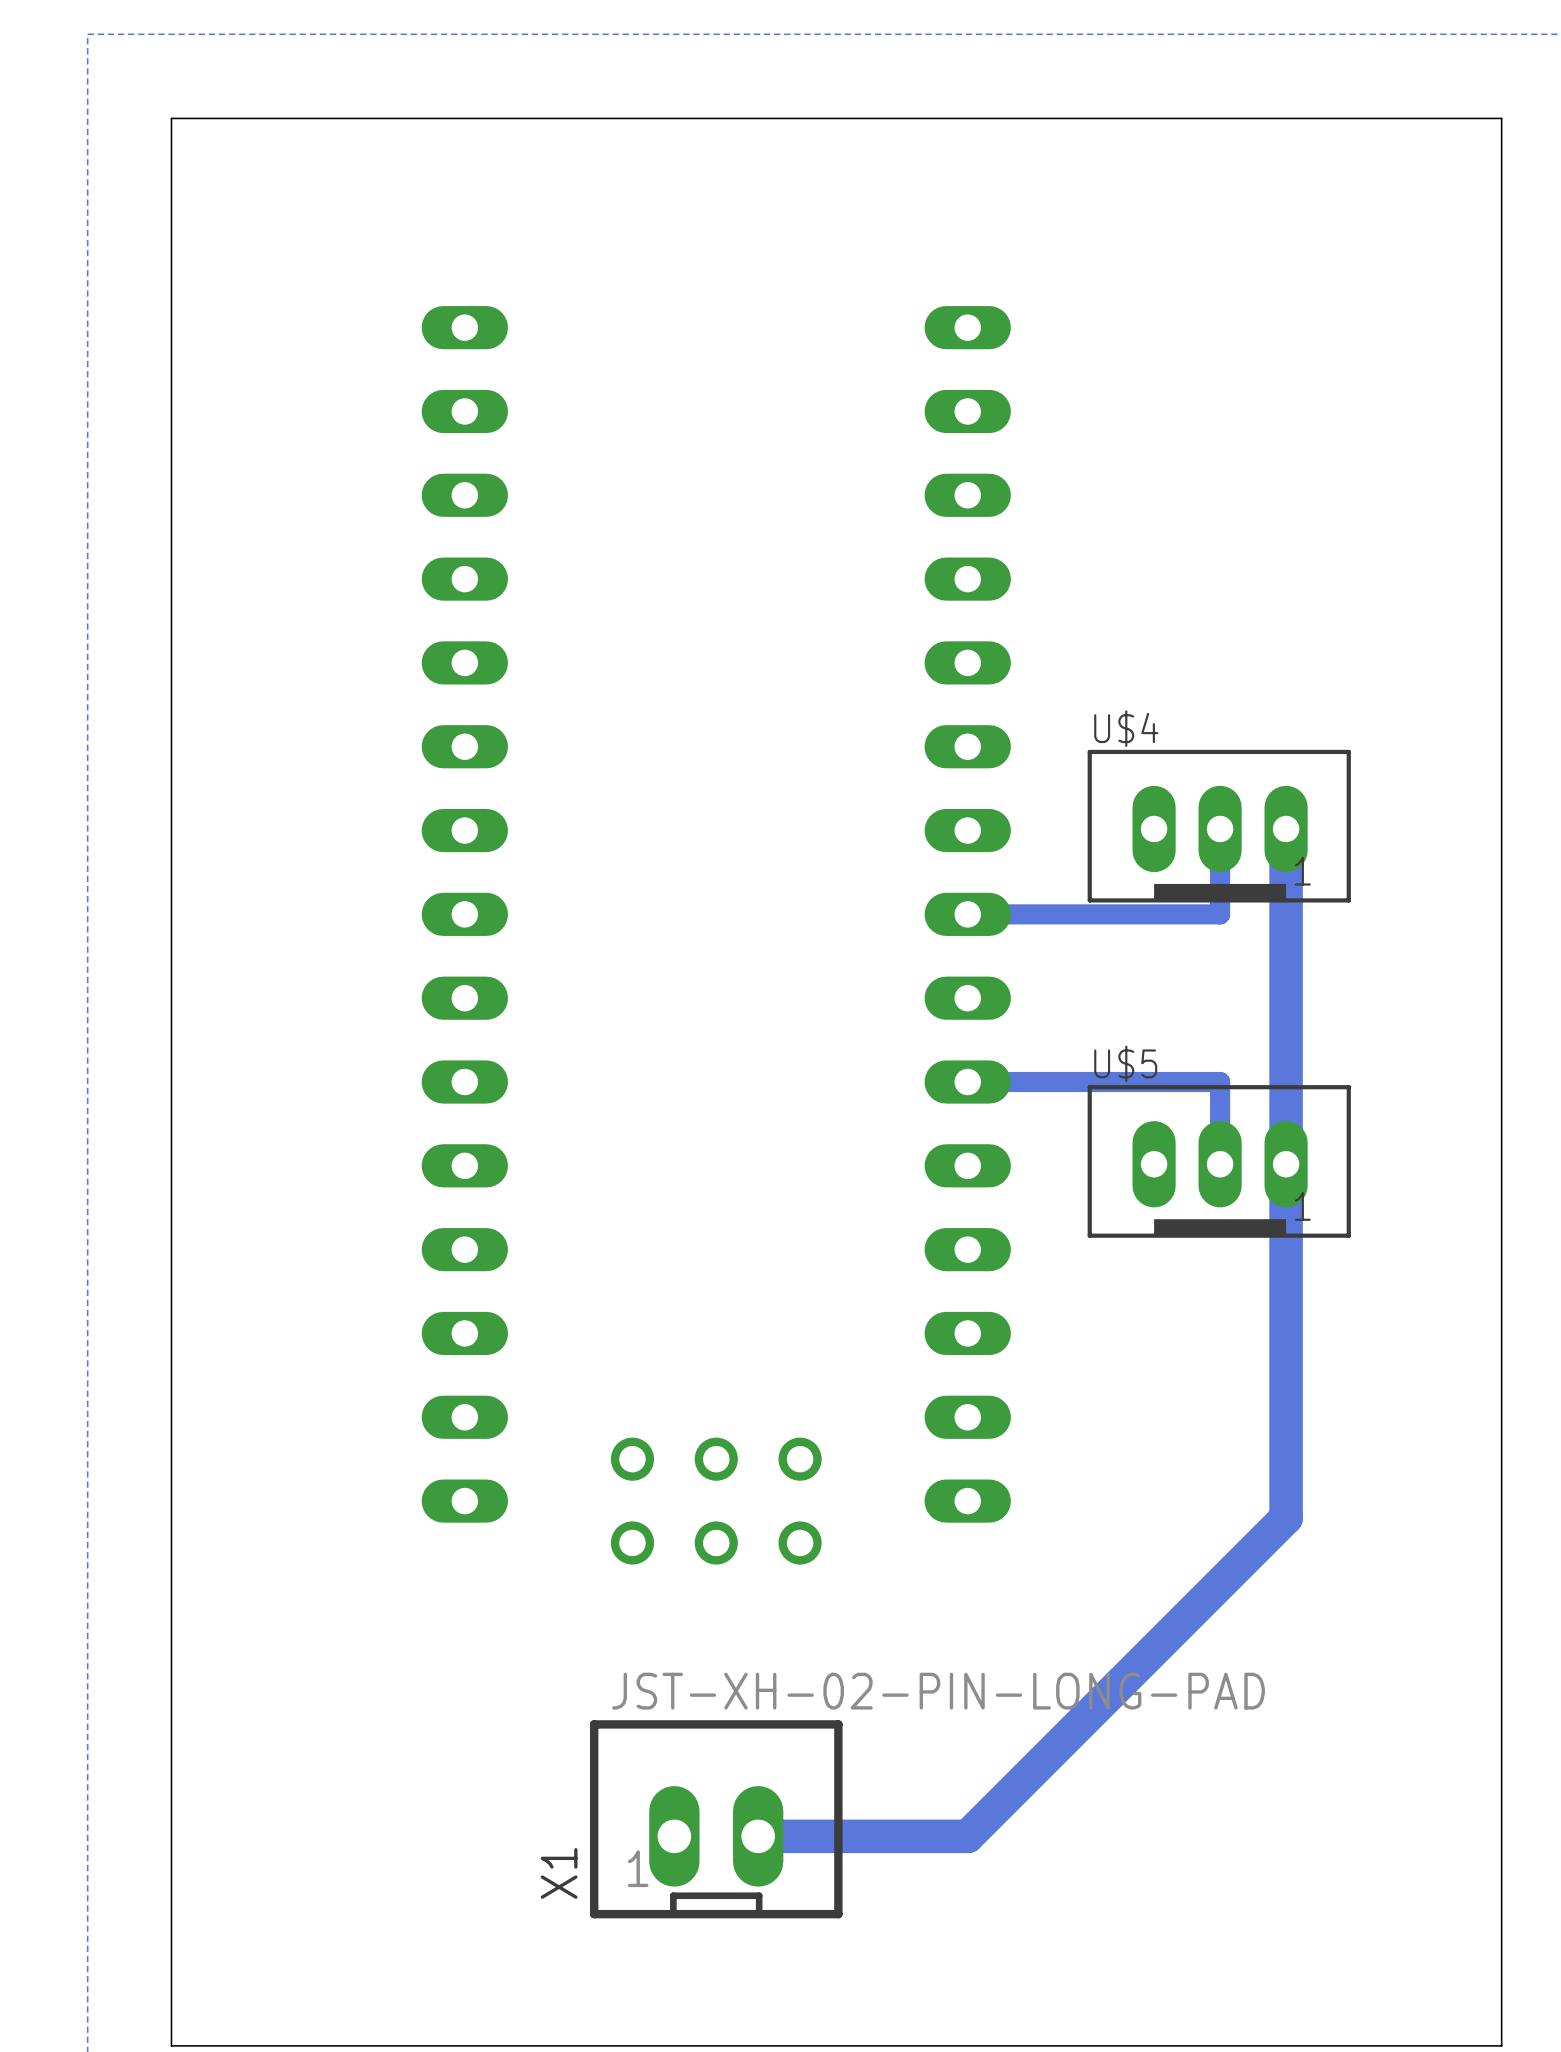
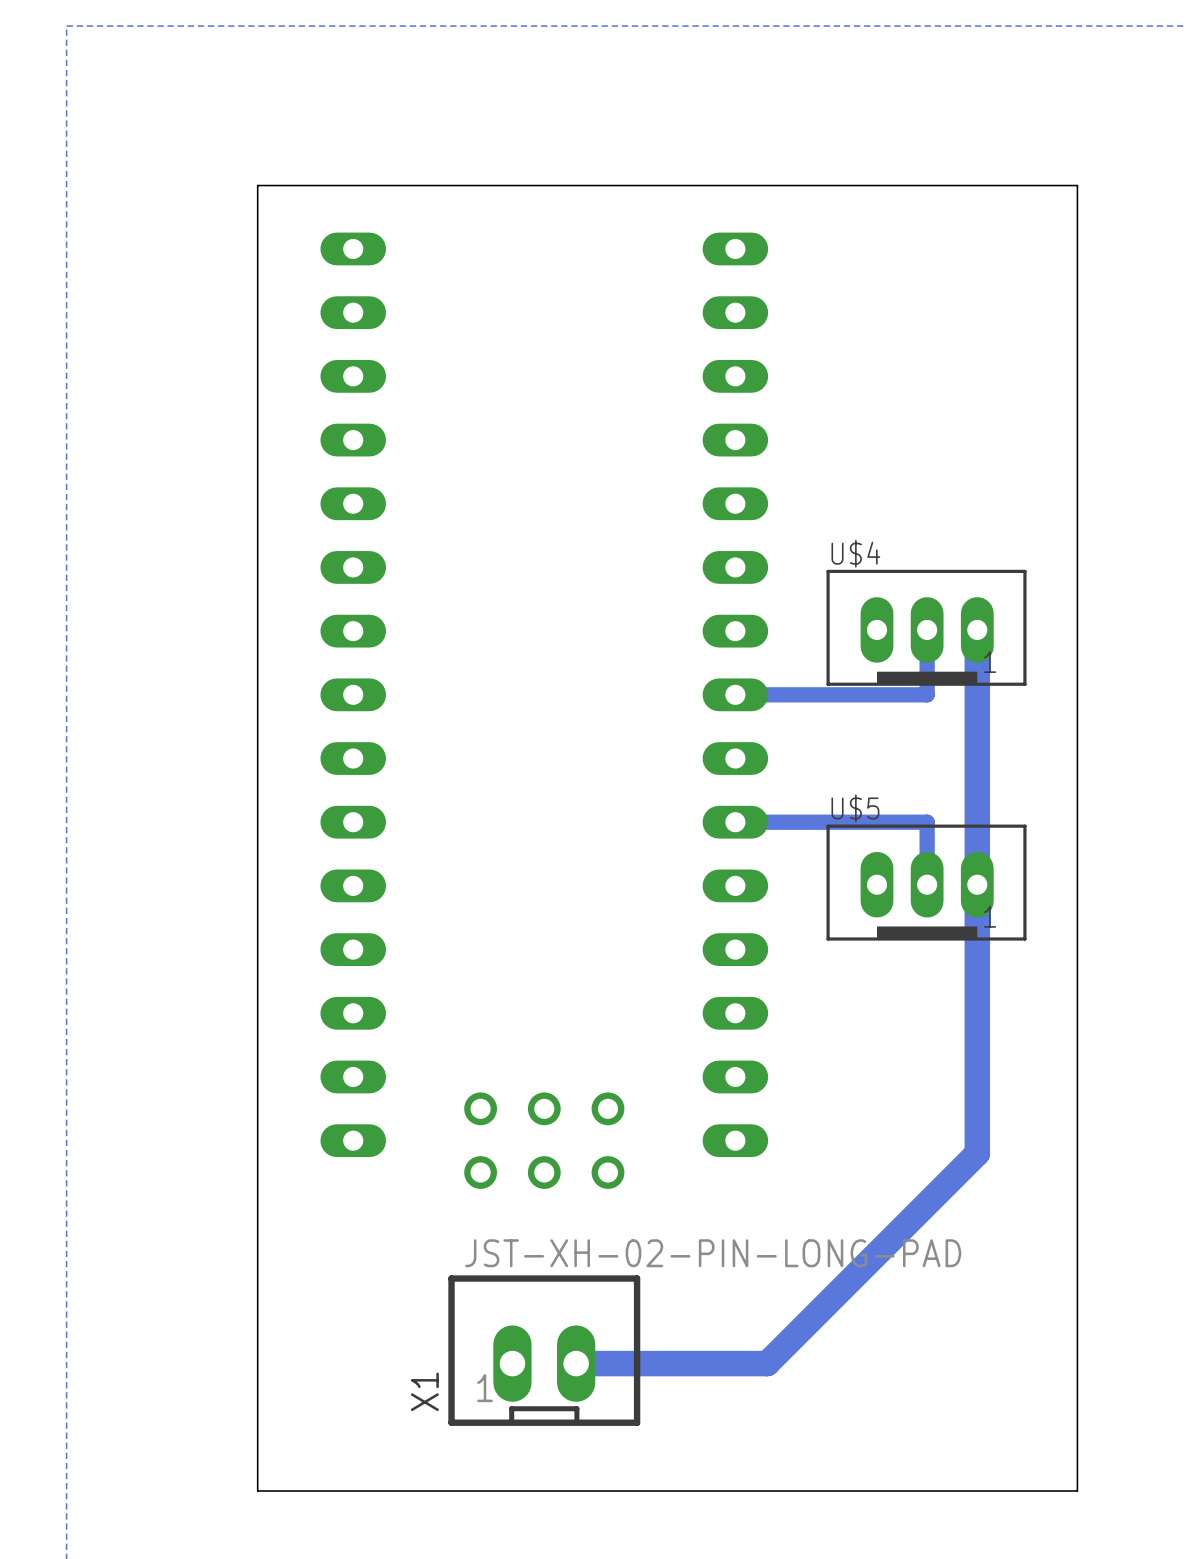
board edge: (171, 118) (1501, 118) (1501, 2045) (171, 2045) (171, 118) -> (257, 185) (257, 1490) (1077, 1490) (1077, 185) (257, 185)
bottom track: (1009, 1794) (967, 1836) (758, 1836) -> (767, 1363) (576, 1363)
X1 position: (716, 1819) -> (544, 1350)

